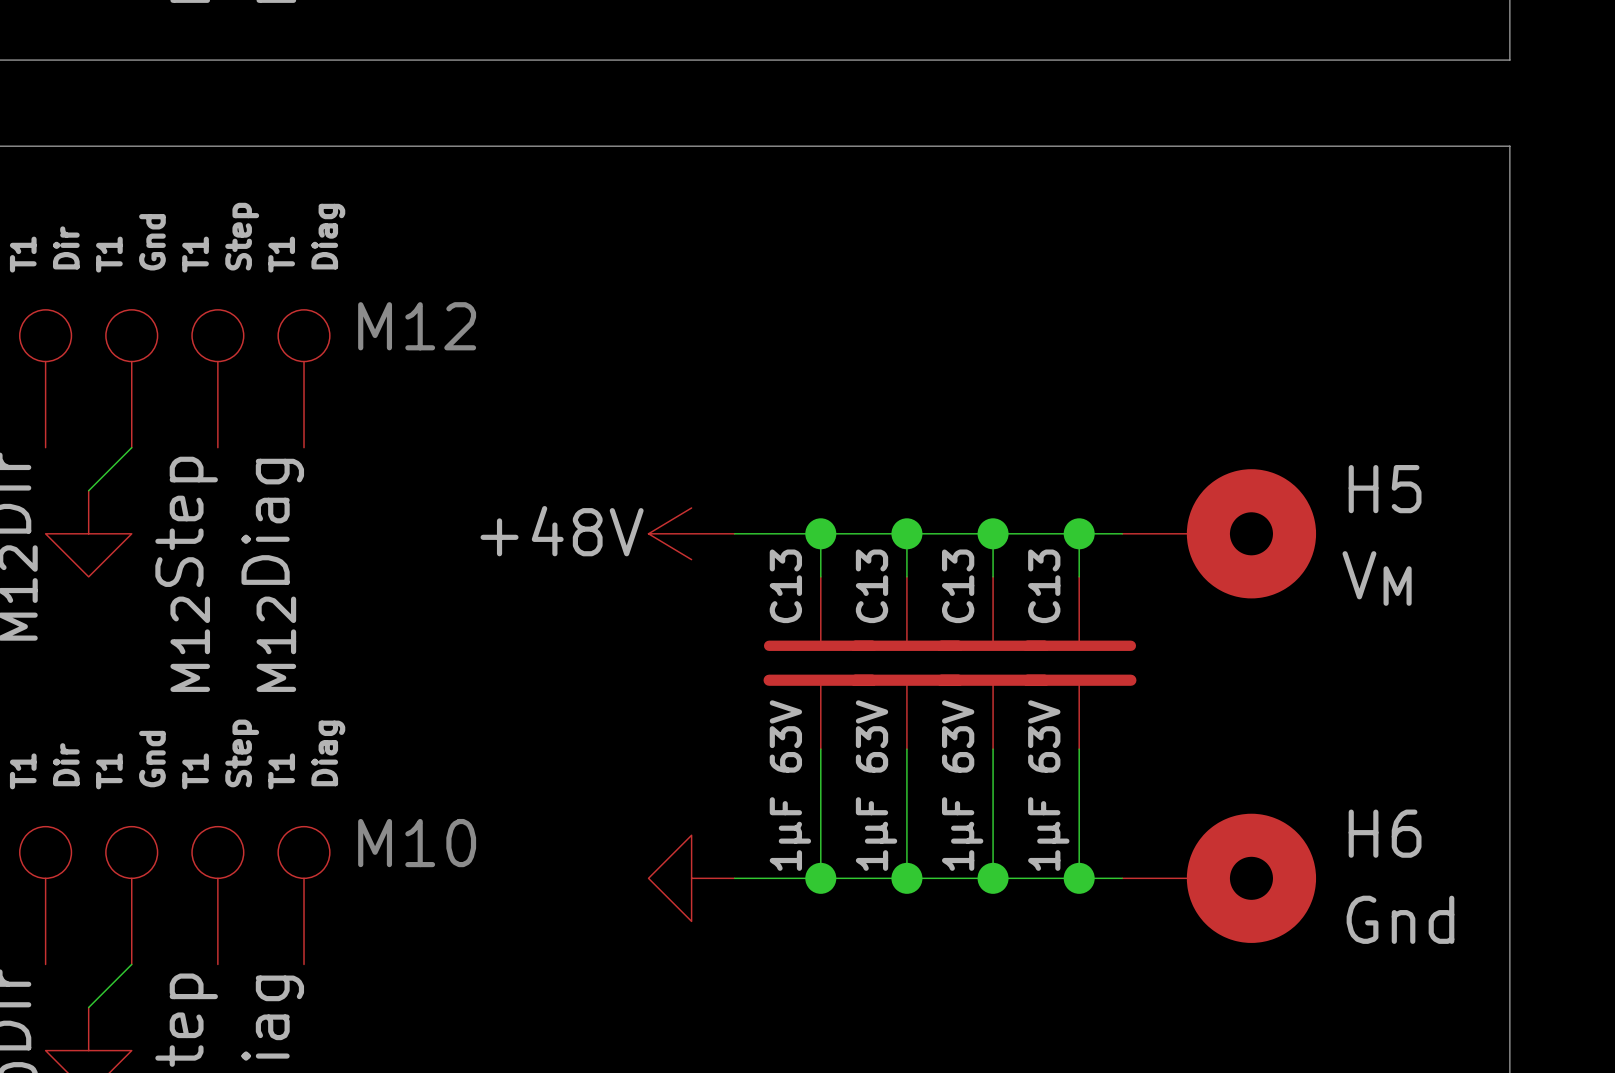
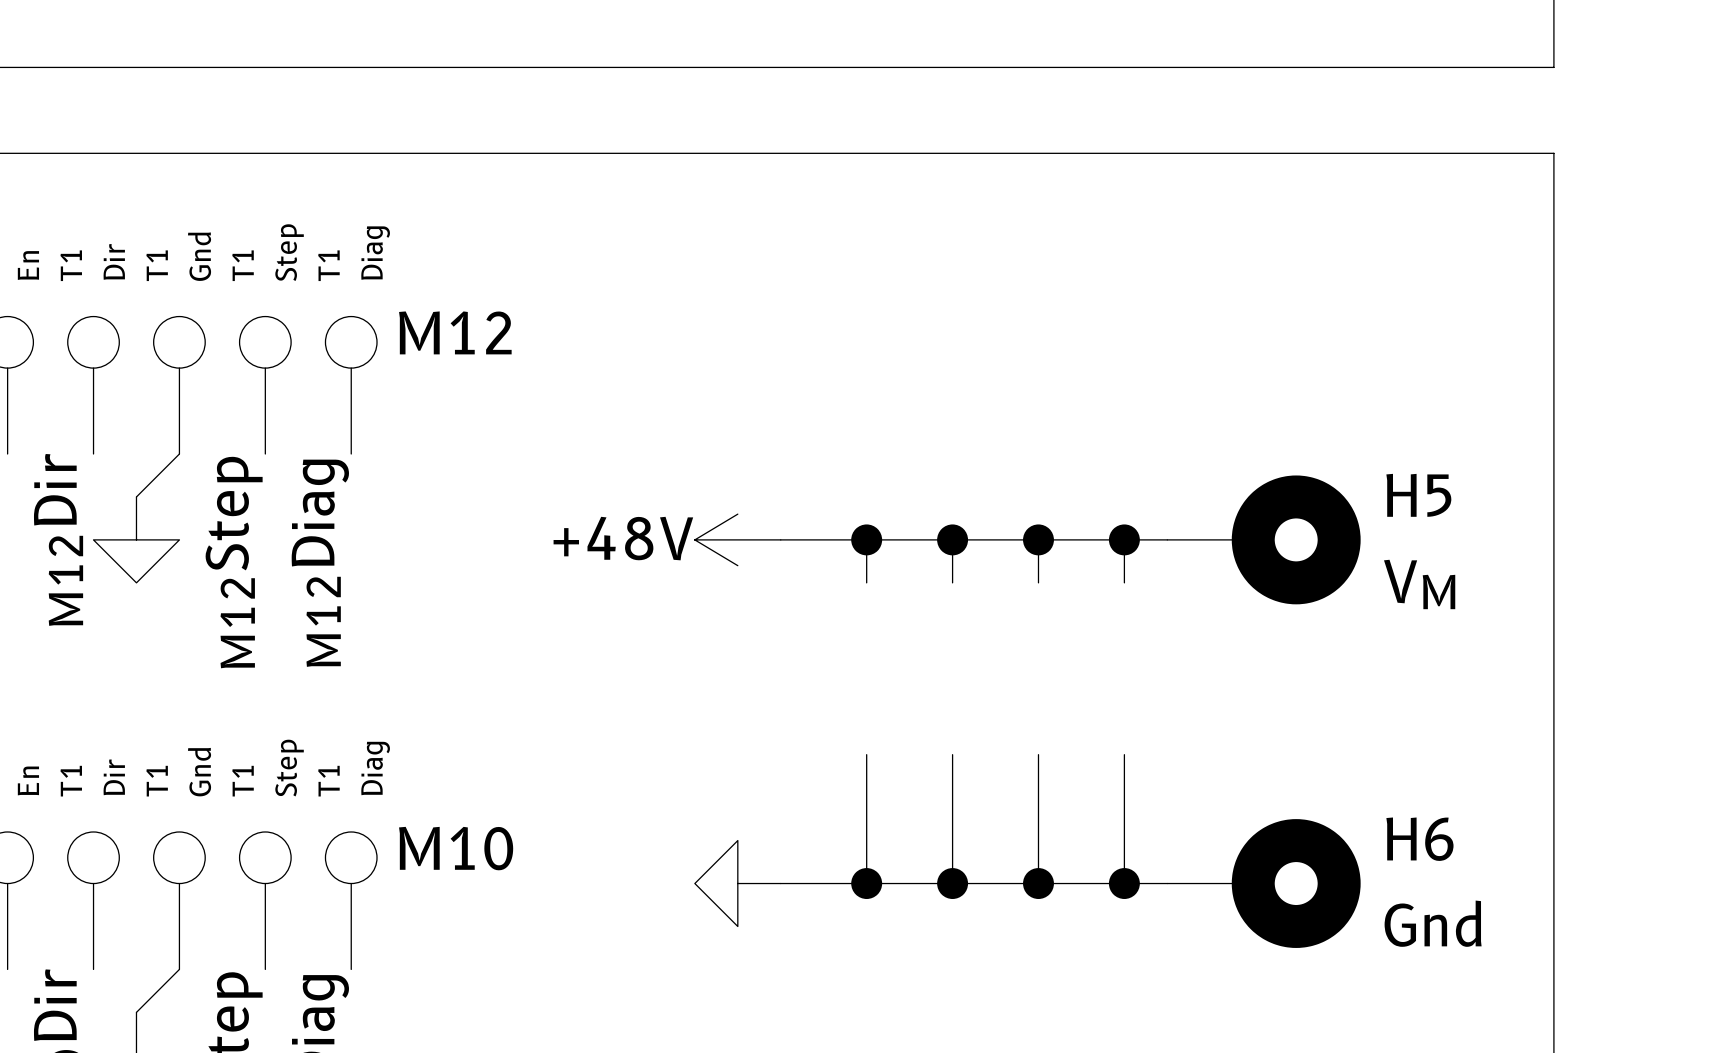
C13: 1μF 63V (820, 663) -> none
C13: 1μF 63V (906, 663) -> none
C13: 1μF 63V (993, 663) -> none
C13: 1μF 63V (1079, 663) -> none

